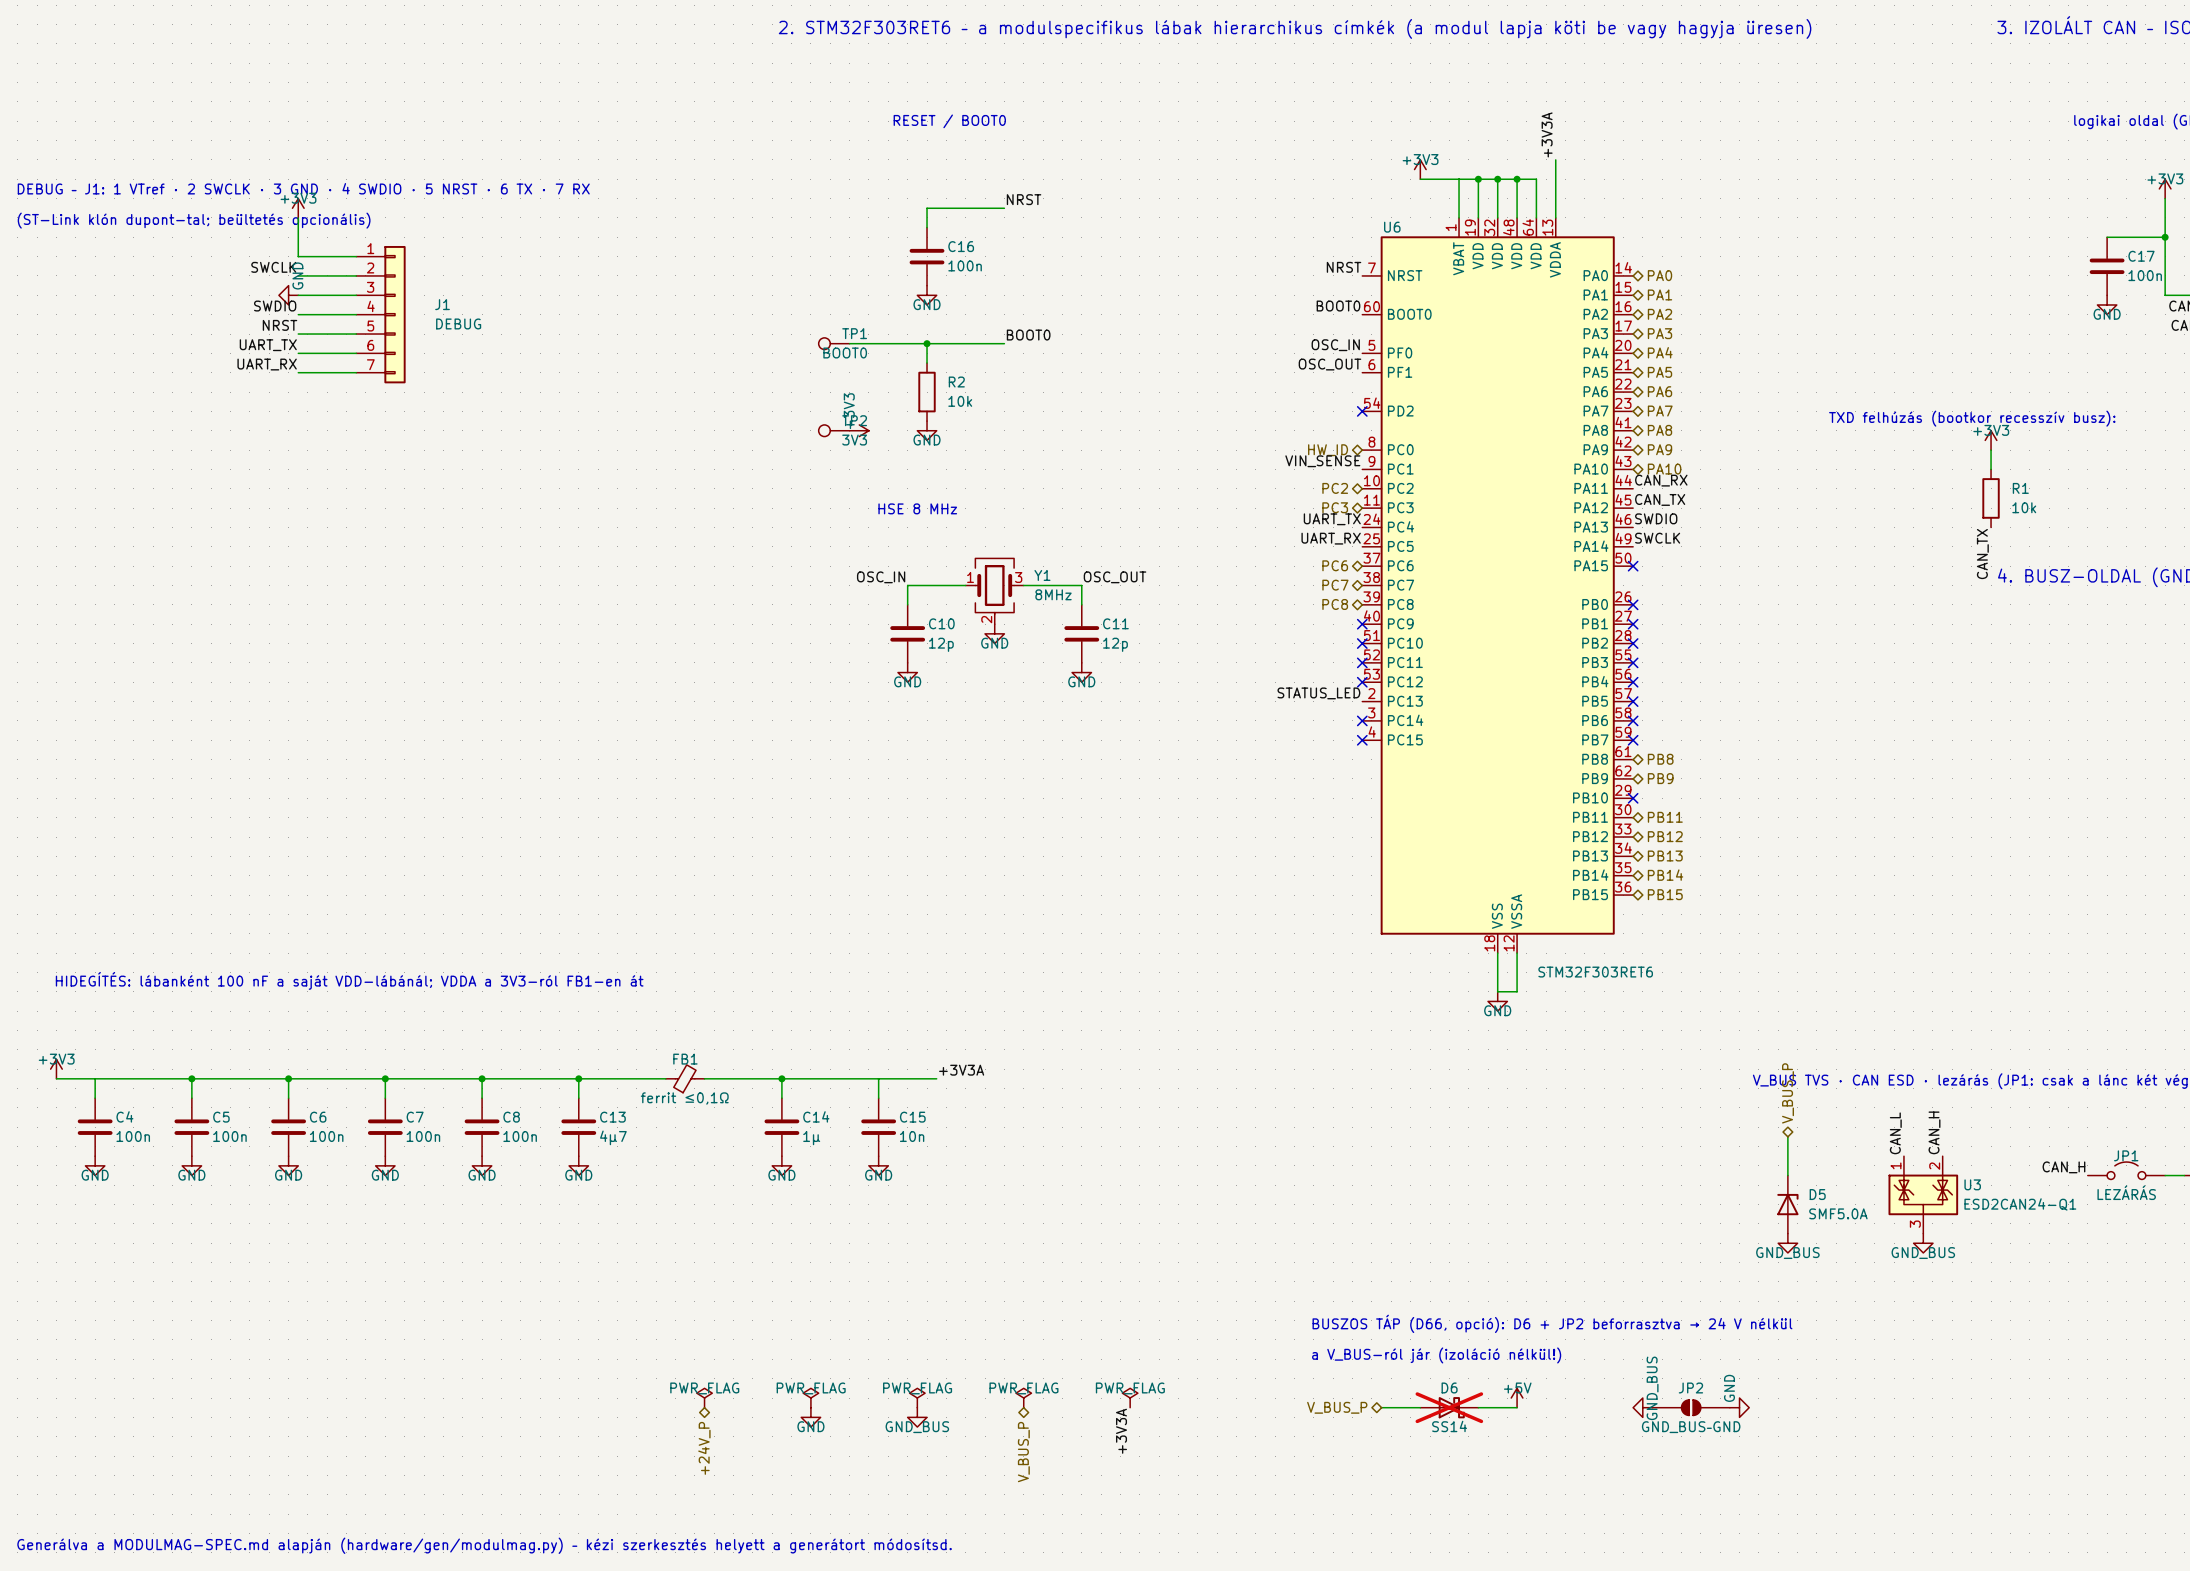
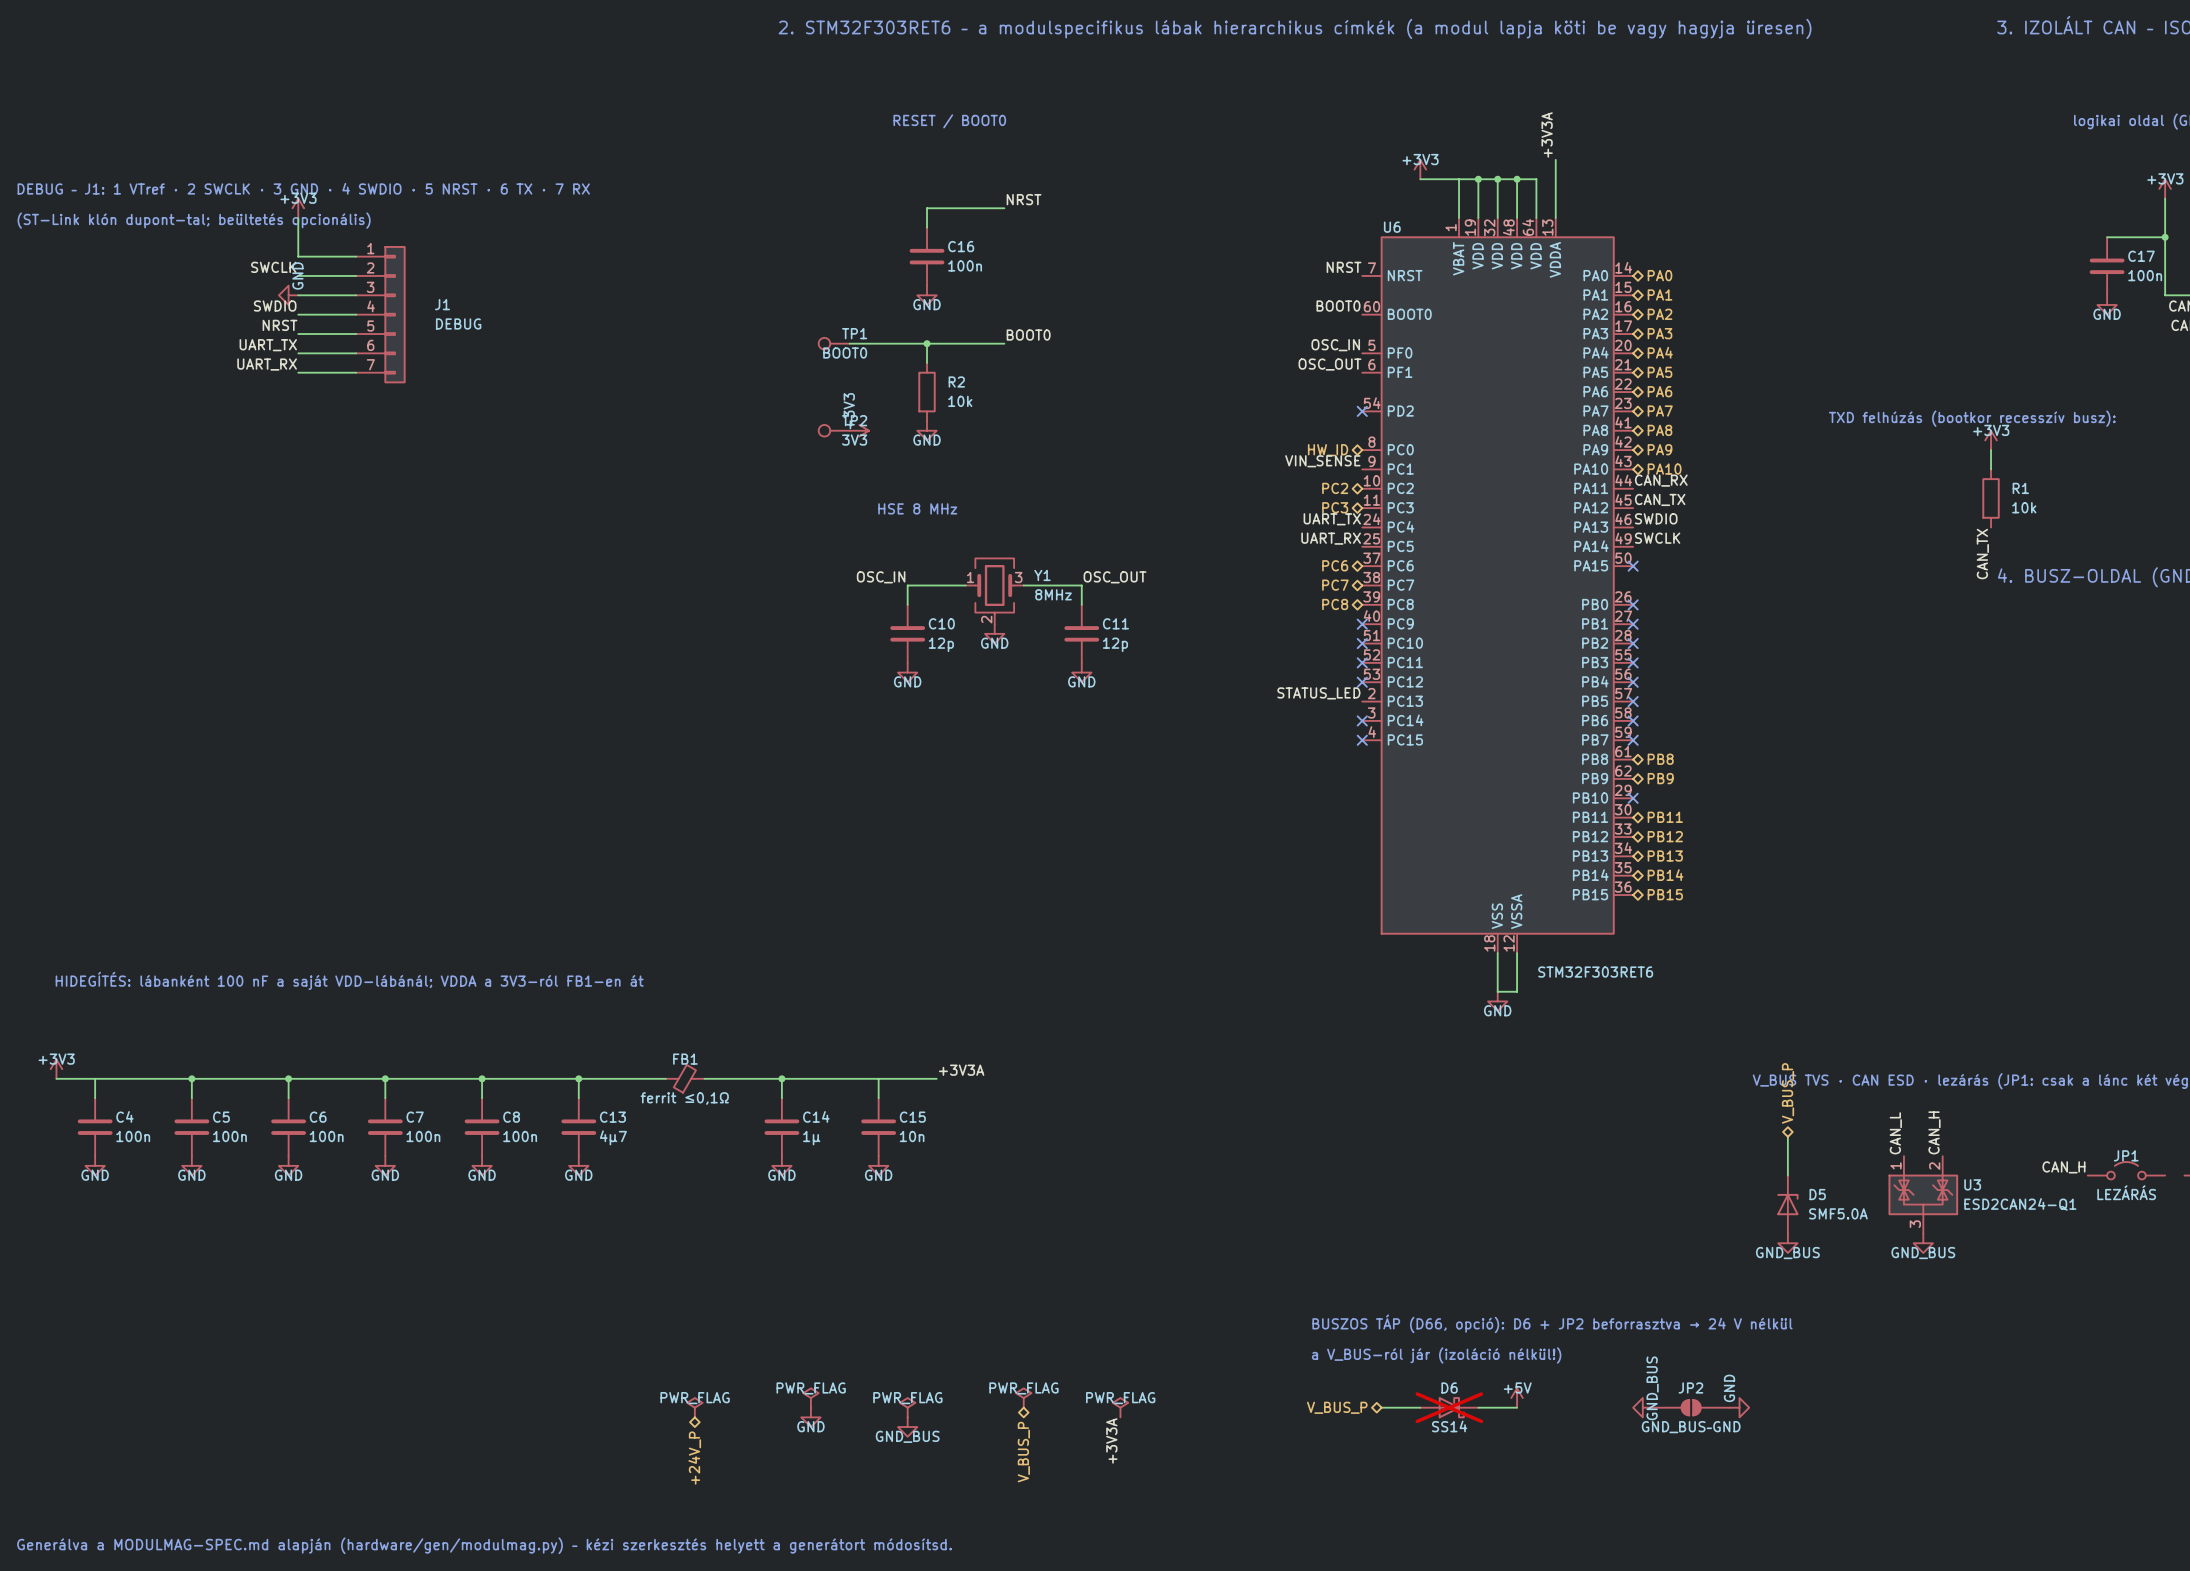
wire: (2165, 1175) (2184, 1175) -> none
power symbol position: PWR_FLAG (704, 1398) -> PWR_FLAG (694, 1407)
power symbol position: PWR_FLAG (917, 1398) -> PWR_FLAG (907, 1407)
power symbol position: PWR_FLAG (1130, 1398) -> PWR_FLAG (1120, 1407)
power symbol position: GND_BUS (917, 1417) -> GND_BUS (907, 1427)
label position: +3V3A (1121, 1431) -> +3V3A (1111, 1440)
hierarchical label position: +24V_P (704, 1448) -> +24V_P (694, 1458)

